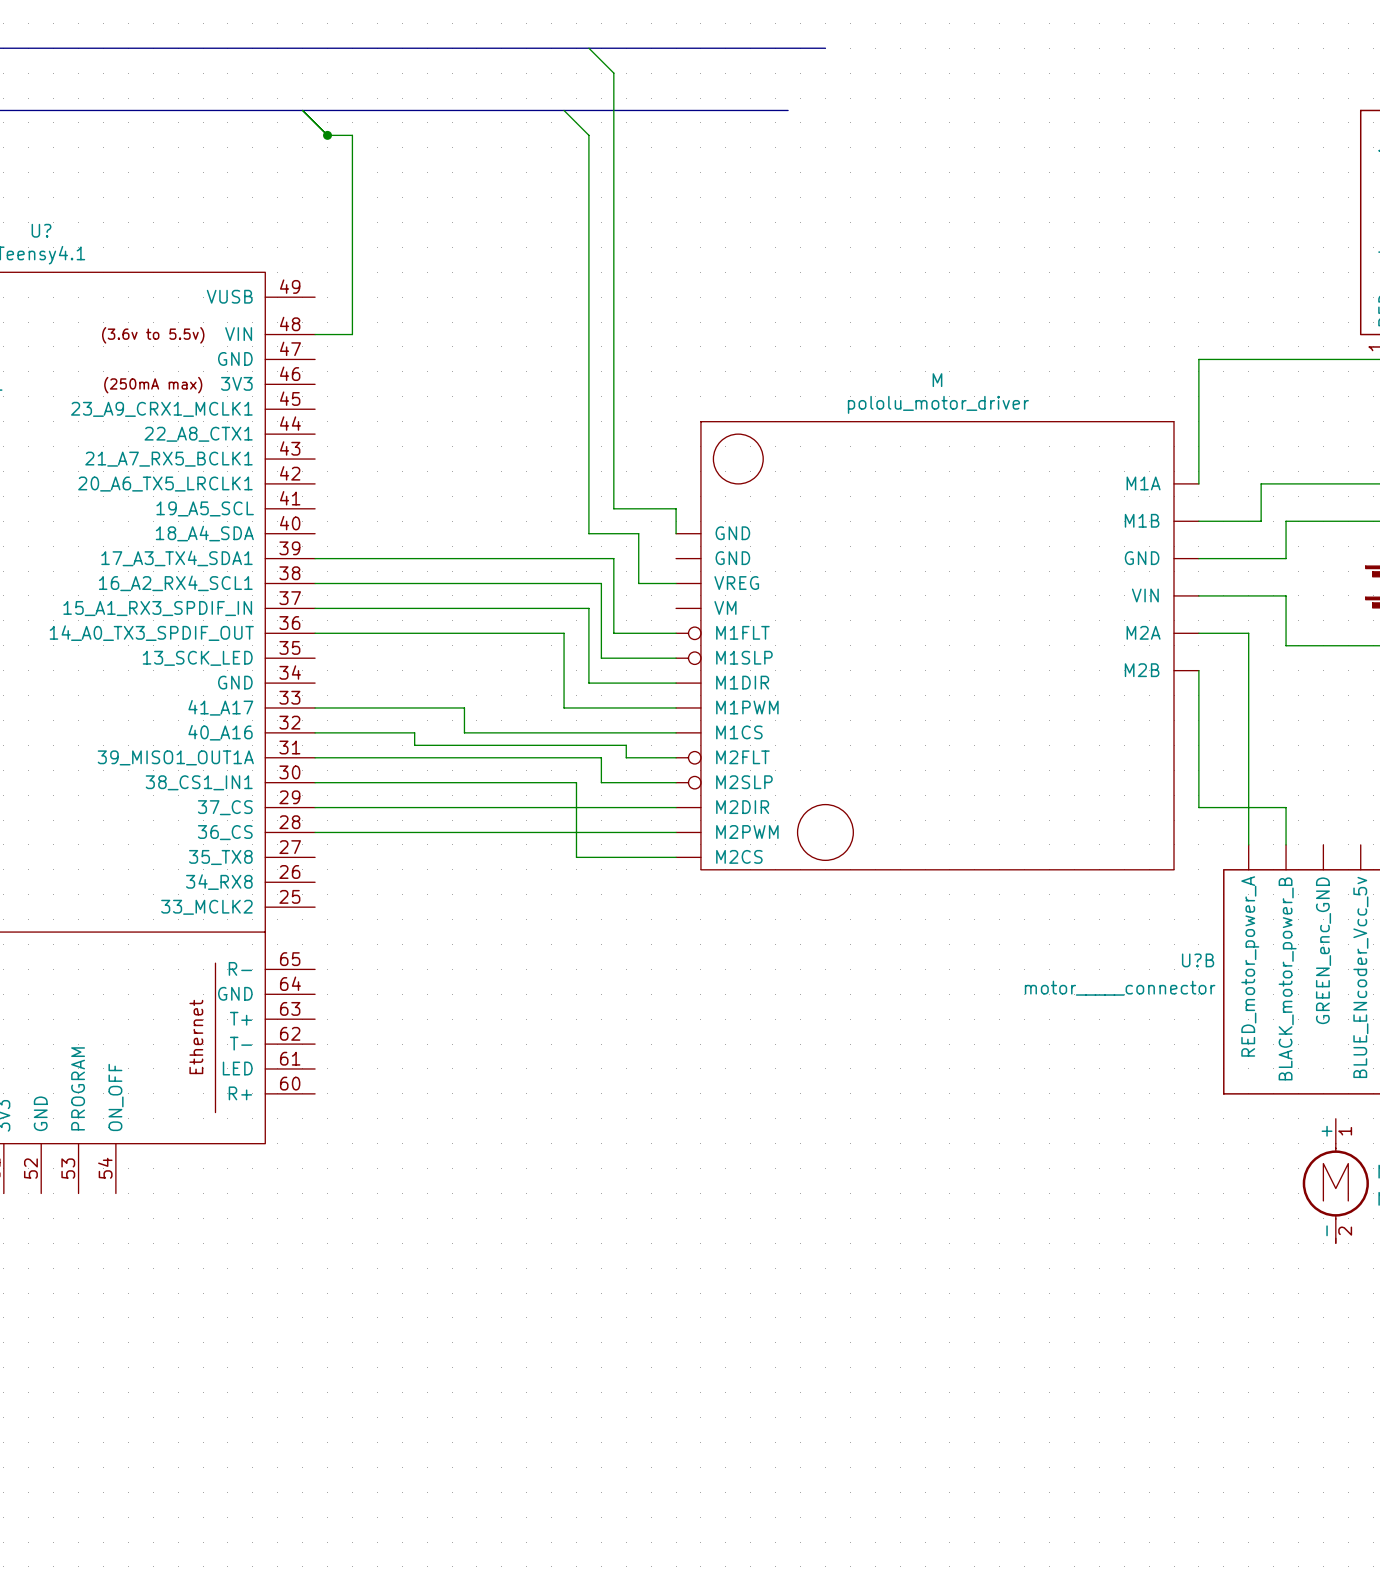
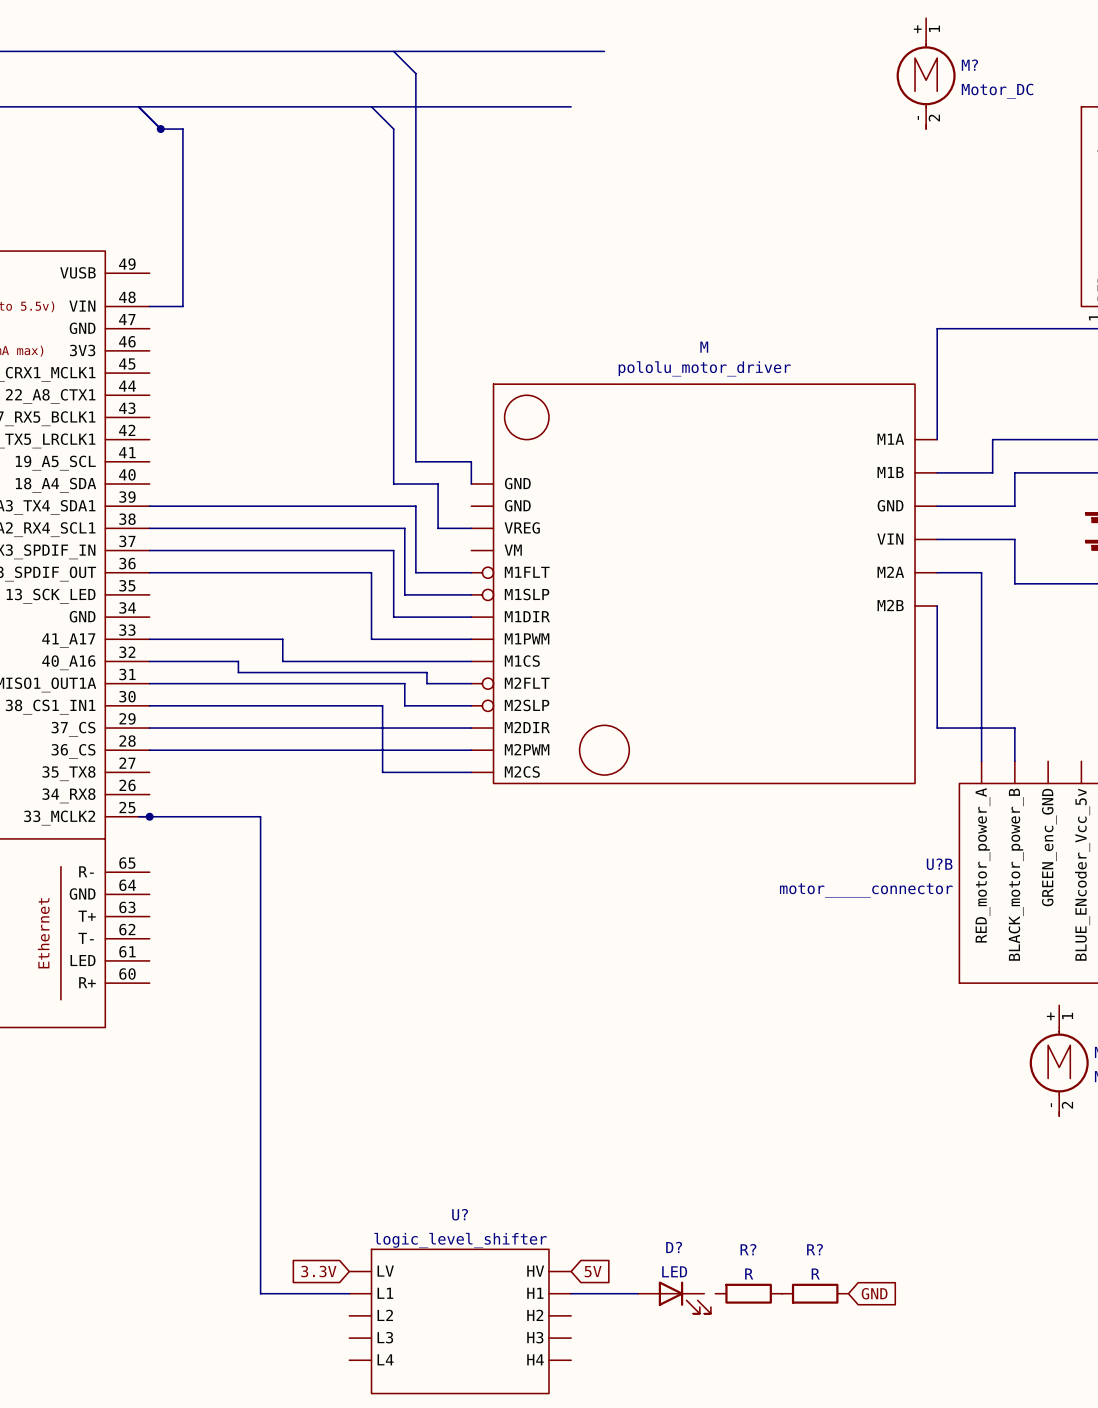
M?: none -> Motor_DC (926, 73)
wire: none -> (138, 816) (260, 816) (260, 1293) (349, 1293)
junction: none -> (149, 816)
global label: none -> 3.3V (318, 1271)
global label: none -> 5V (593, 1271)
wire: none -> (571, 1293) (637, 1293)
R?: none -> R (748, 1293)
R?: none -> R (815, 1293)
global label: none -> GND (874, 1293)
D?: none -> LED (674, 1297)
U?: none -> logic_level_shifter (460, 1321)

